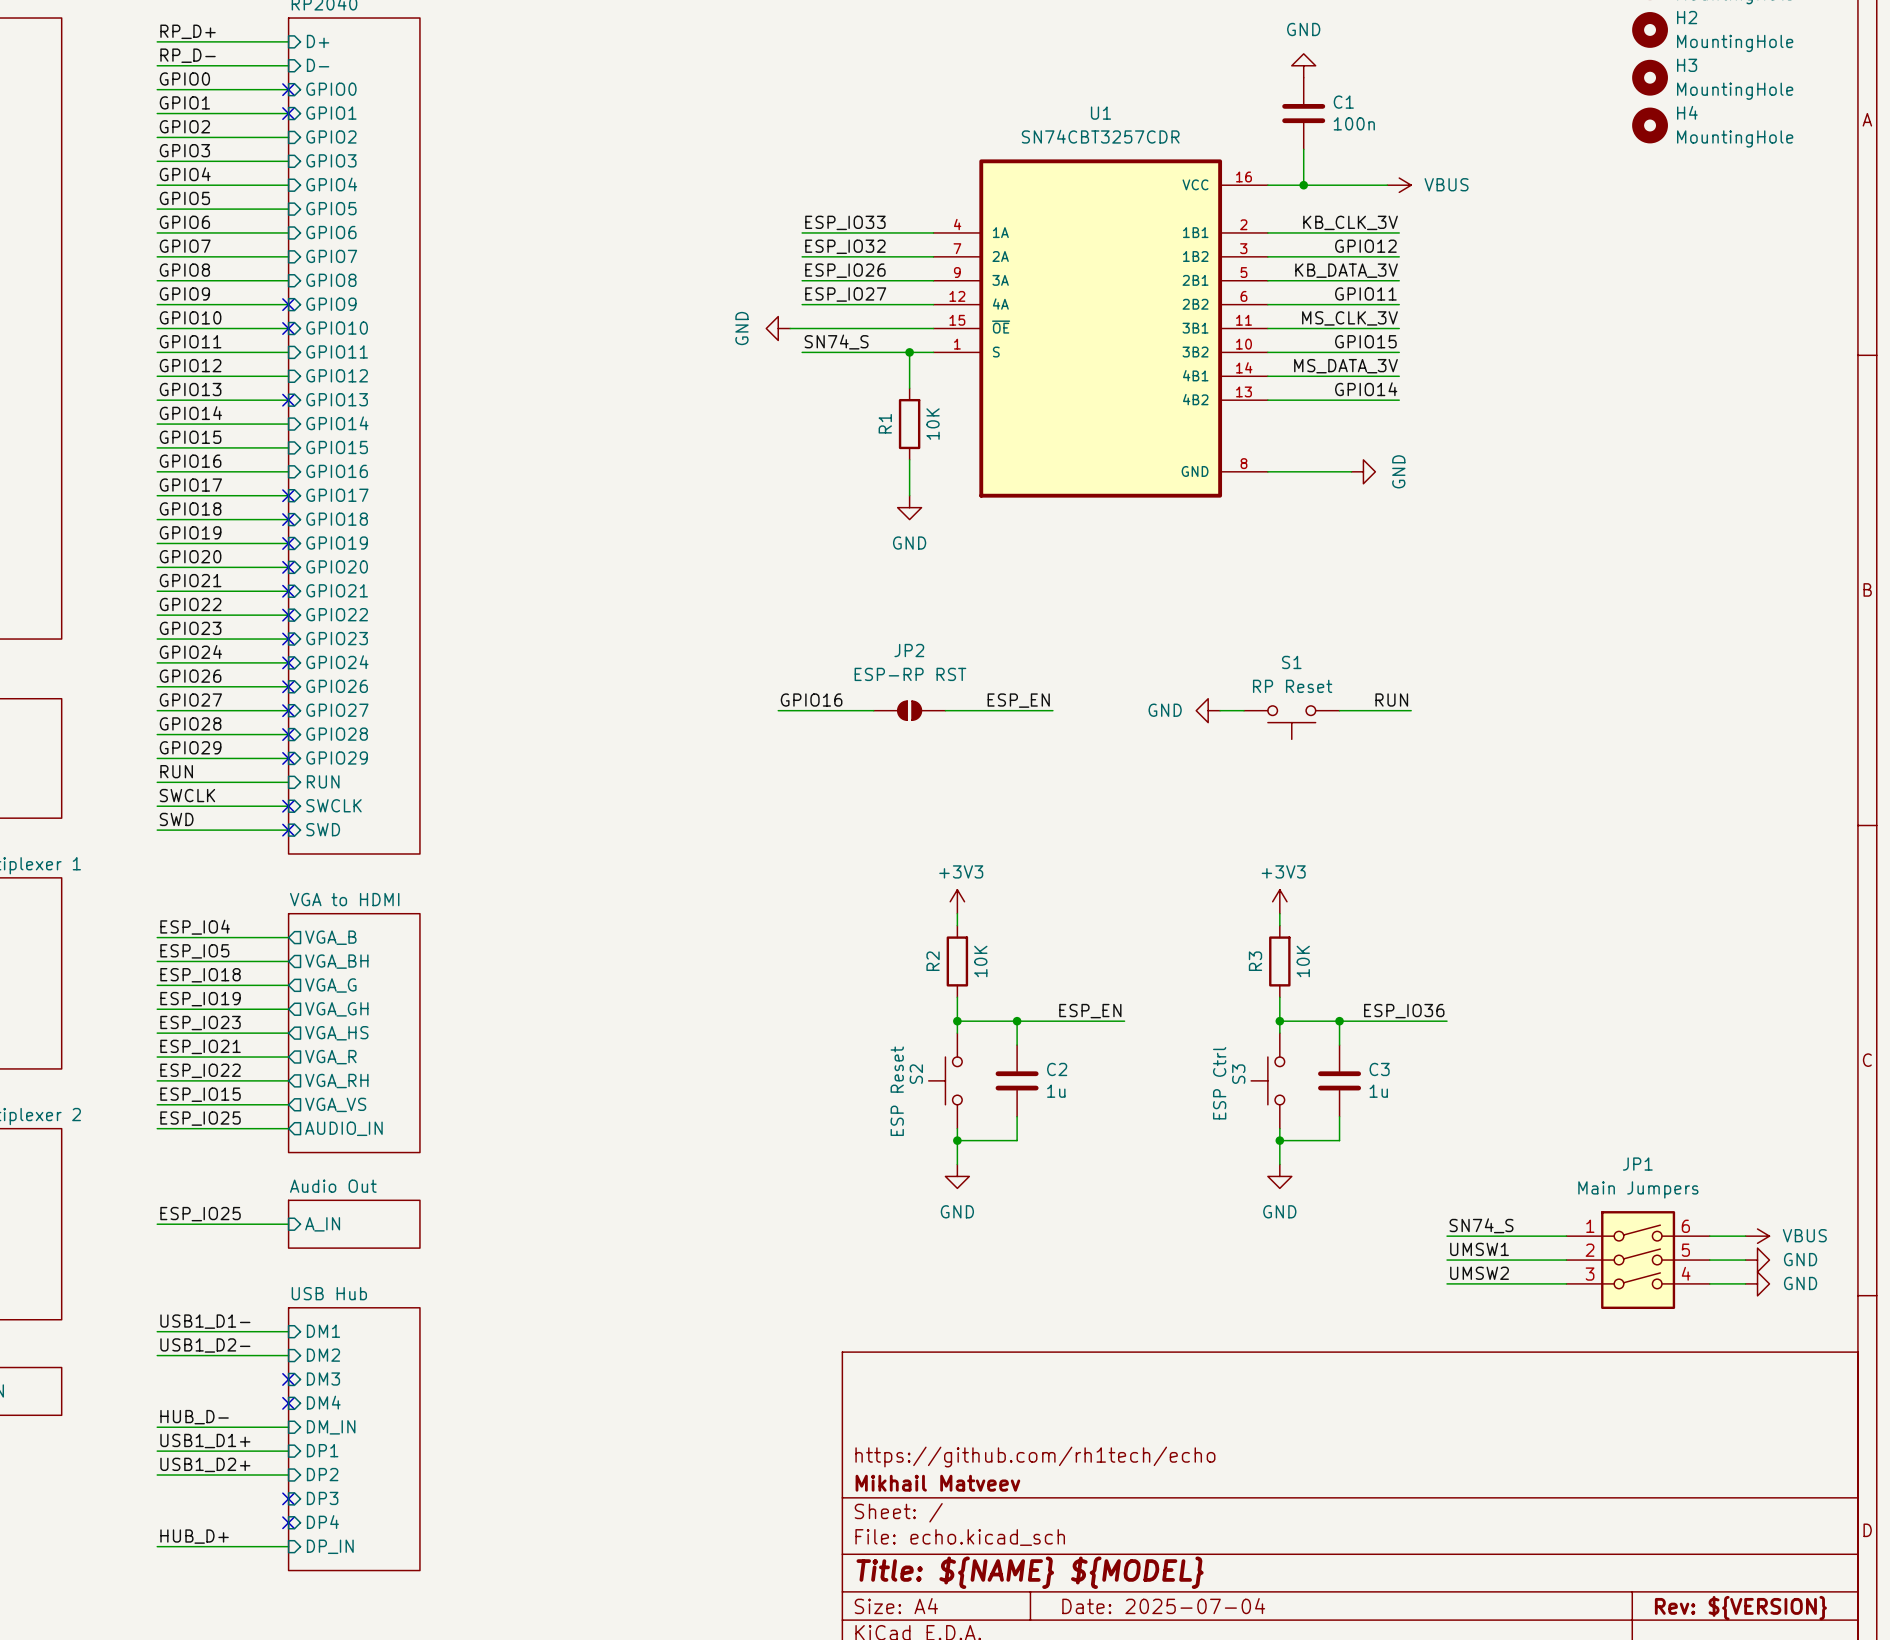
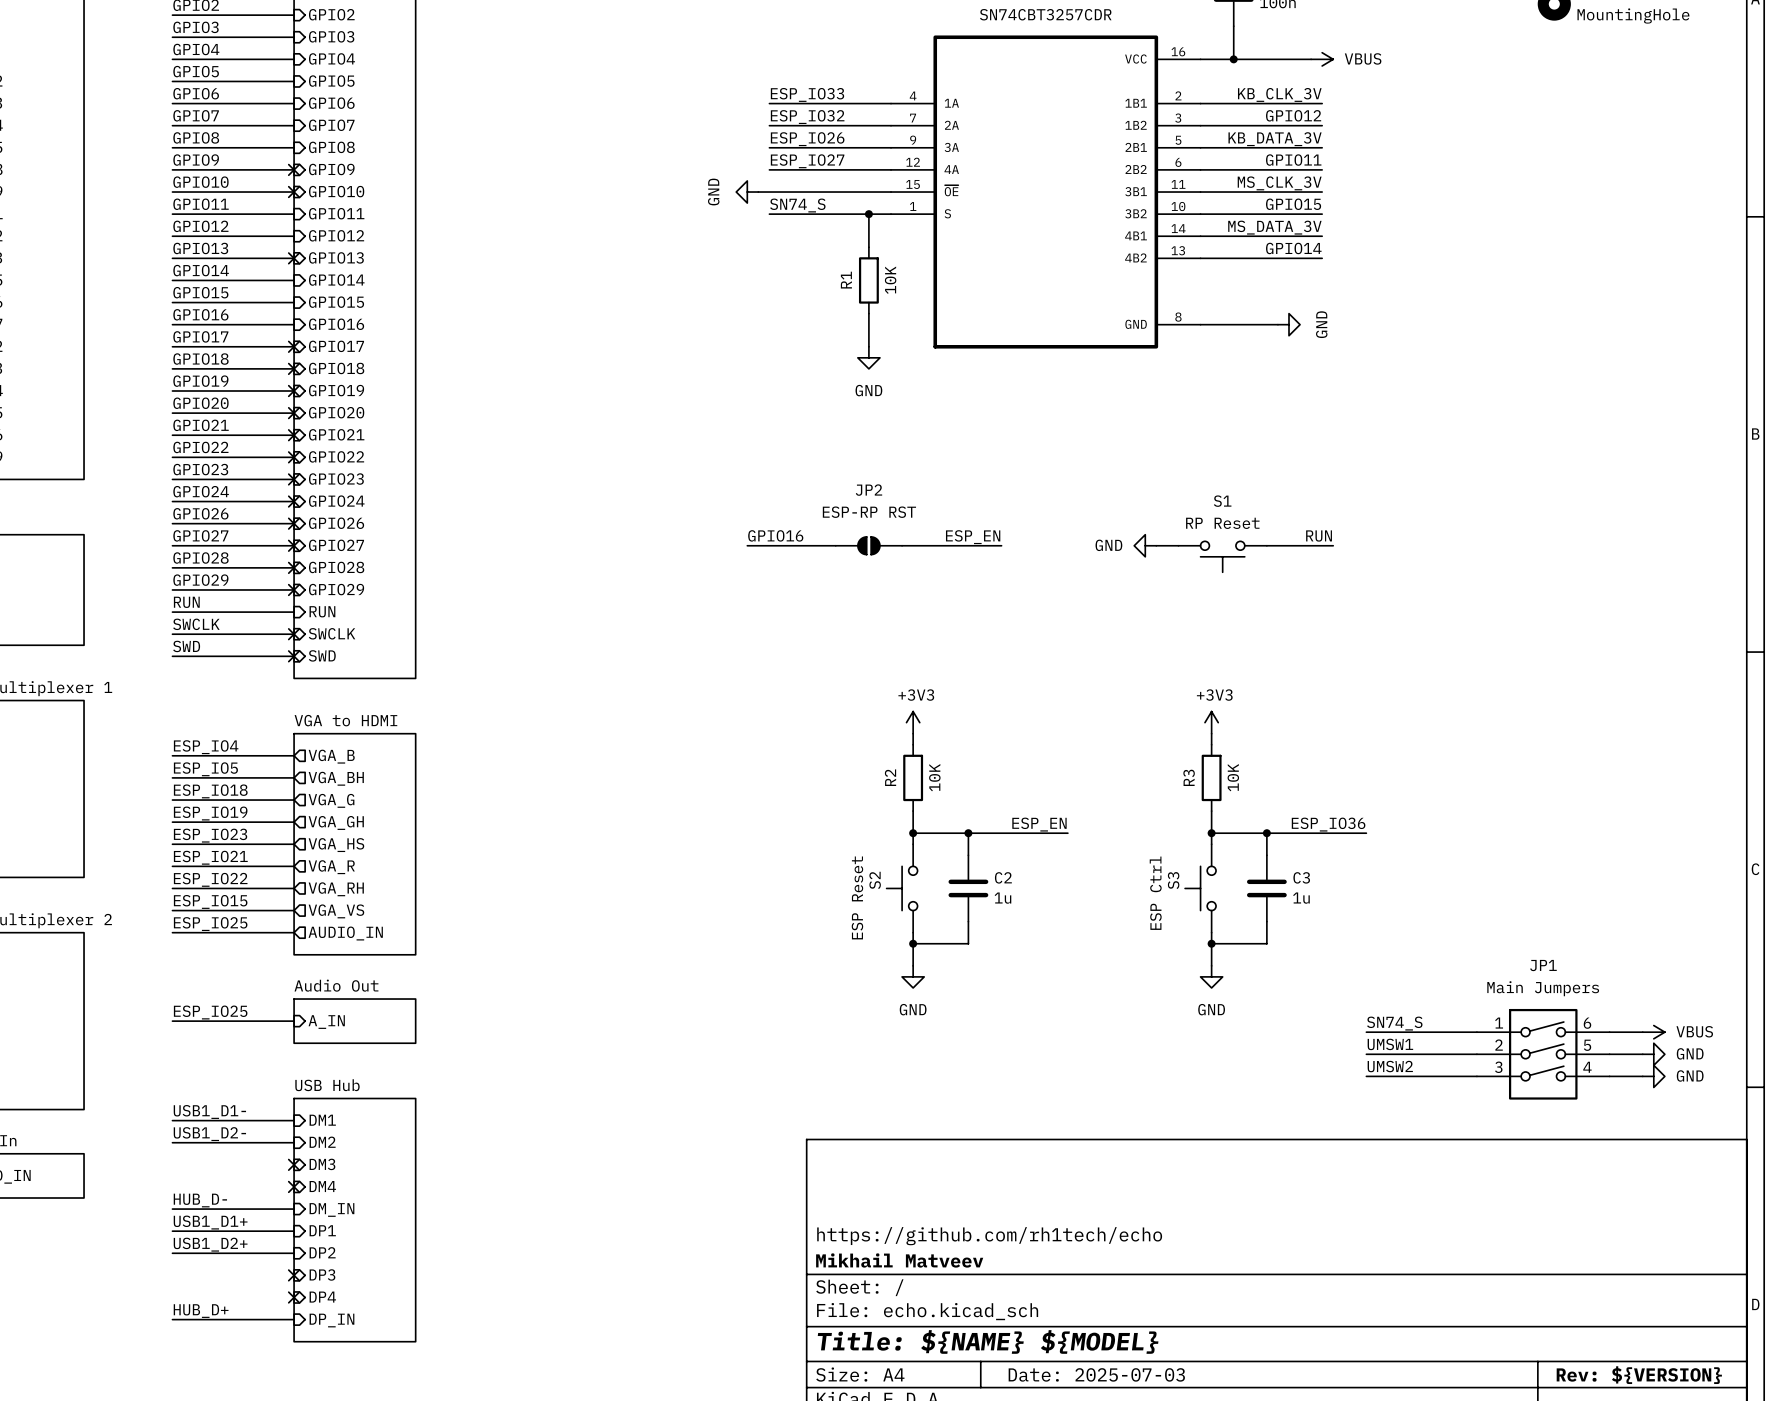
title block: Date: 2025-07-04 (1163, 1606) -> Date: 2025-07-03 (1096, 1374)

